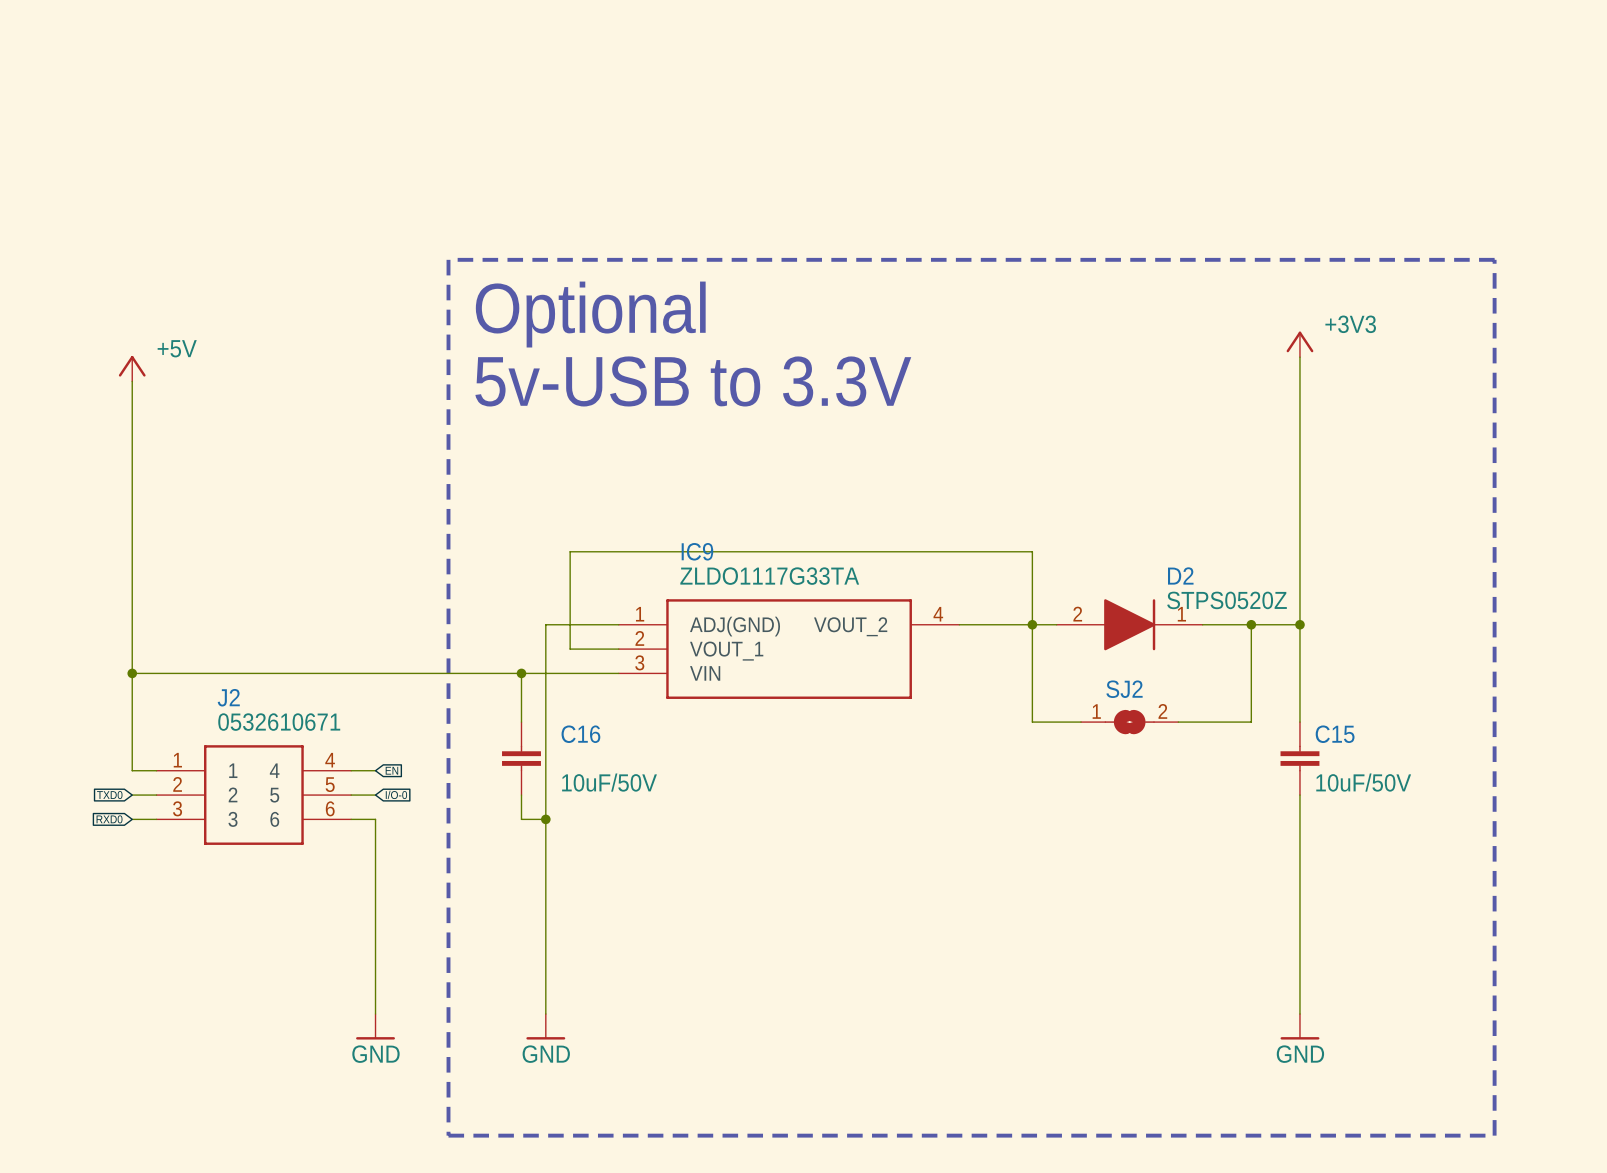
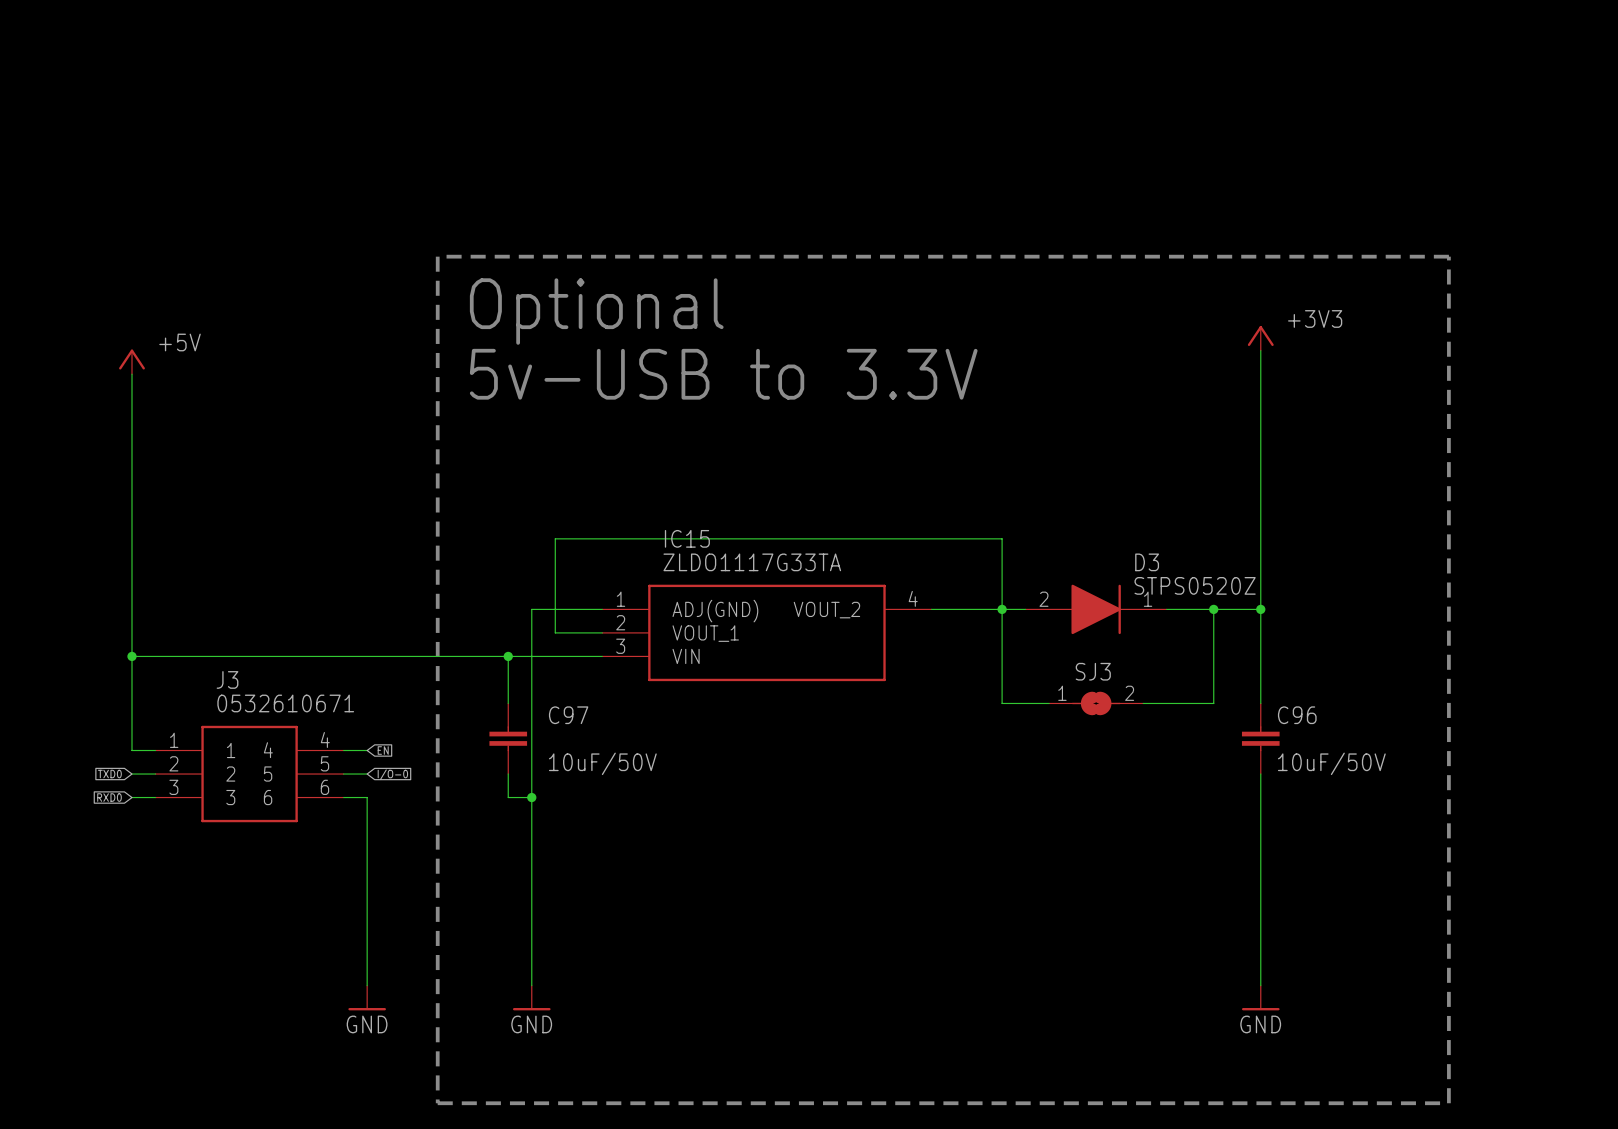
IC9 name: IC9 (697, 551) -> IC15 (687, 538)
D2 name: D2 (1180, 575) -> D3 (1147, 562)
SJ2 name: SJ2 (1124, 689) -> SJ3 (1093, 671)
J2 name: J2 (228, 697) -> J3 (227, 679)
C16 name: C16 (580, 734) -> C97 (568, 715)
C15 name: C15 (1335, 734) -> C96 (1297, 715)

